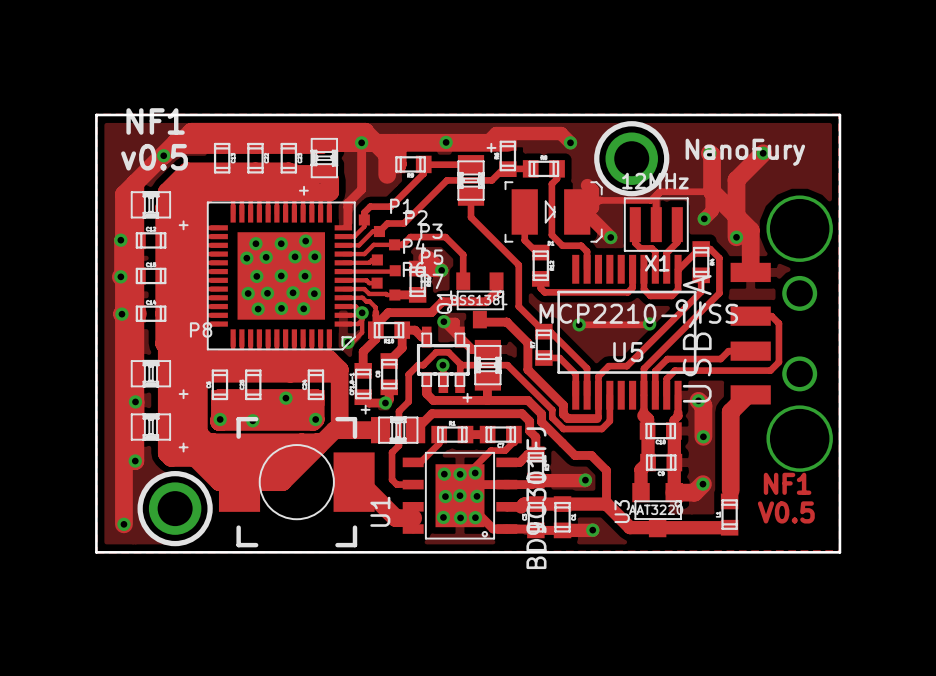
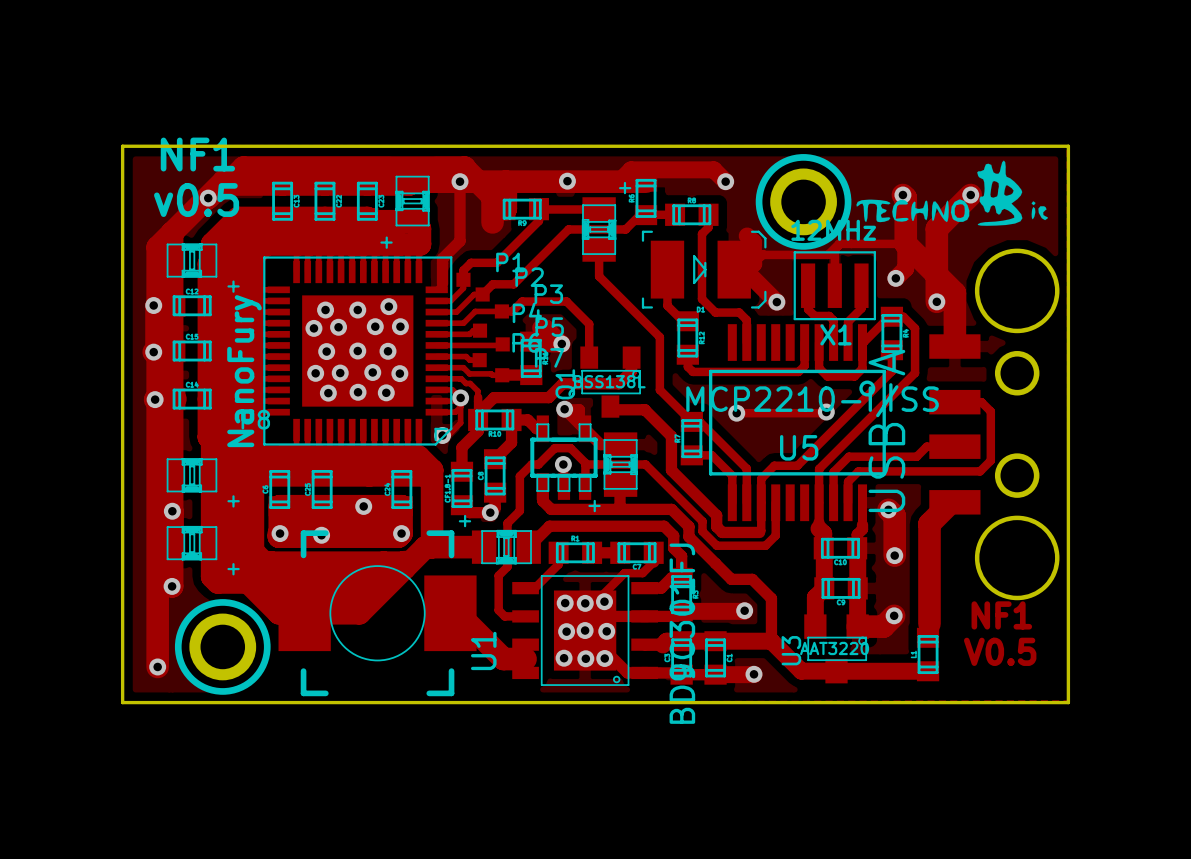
drawing: none -> [856, 160, 1048, 226]
text: NanoFury (745, 152) -> none
text: none -> NanoFury (244, 371)

